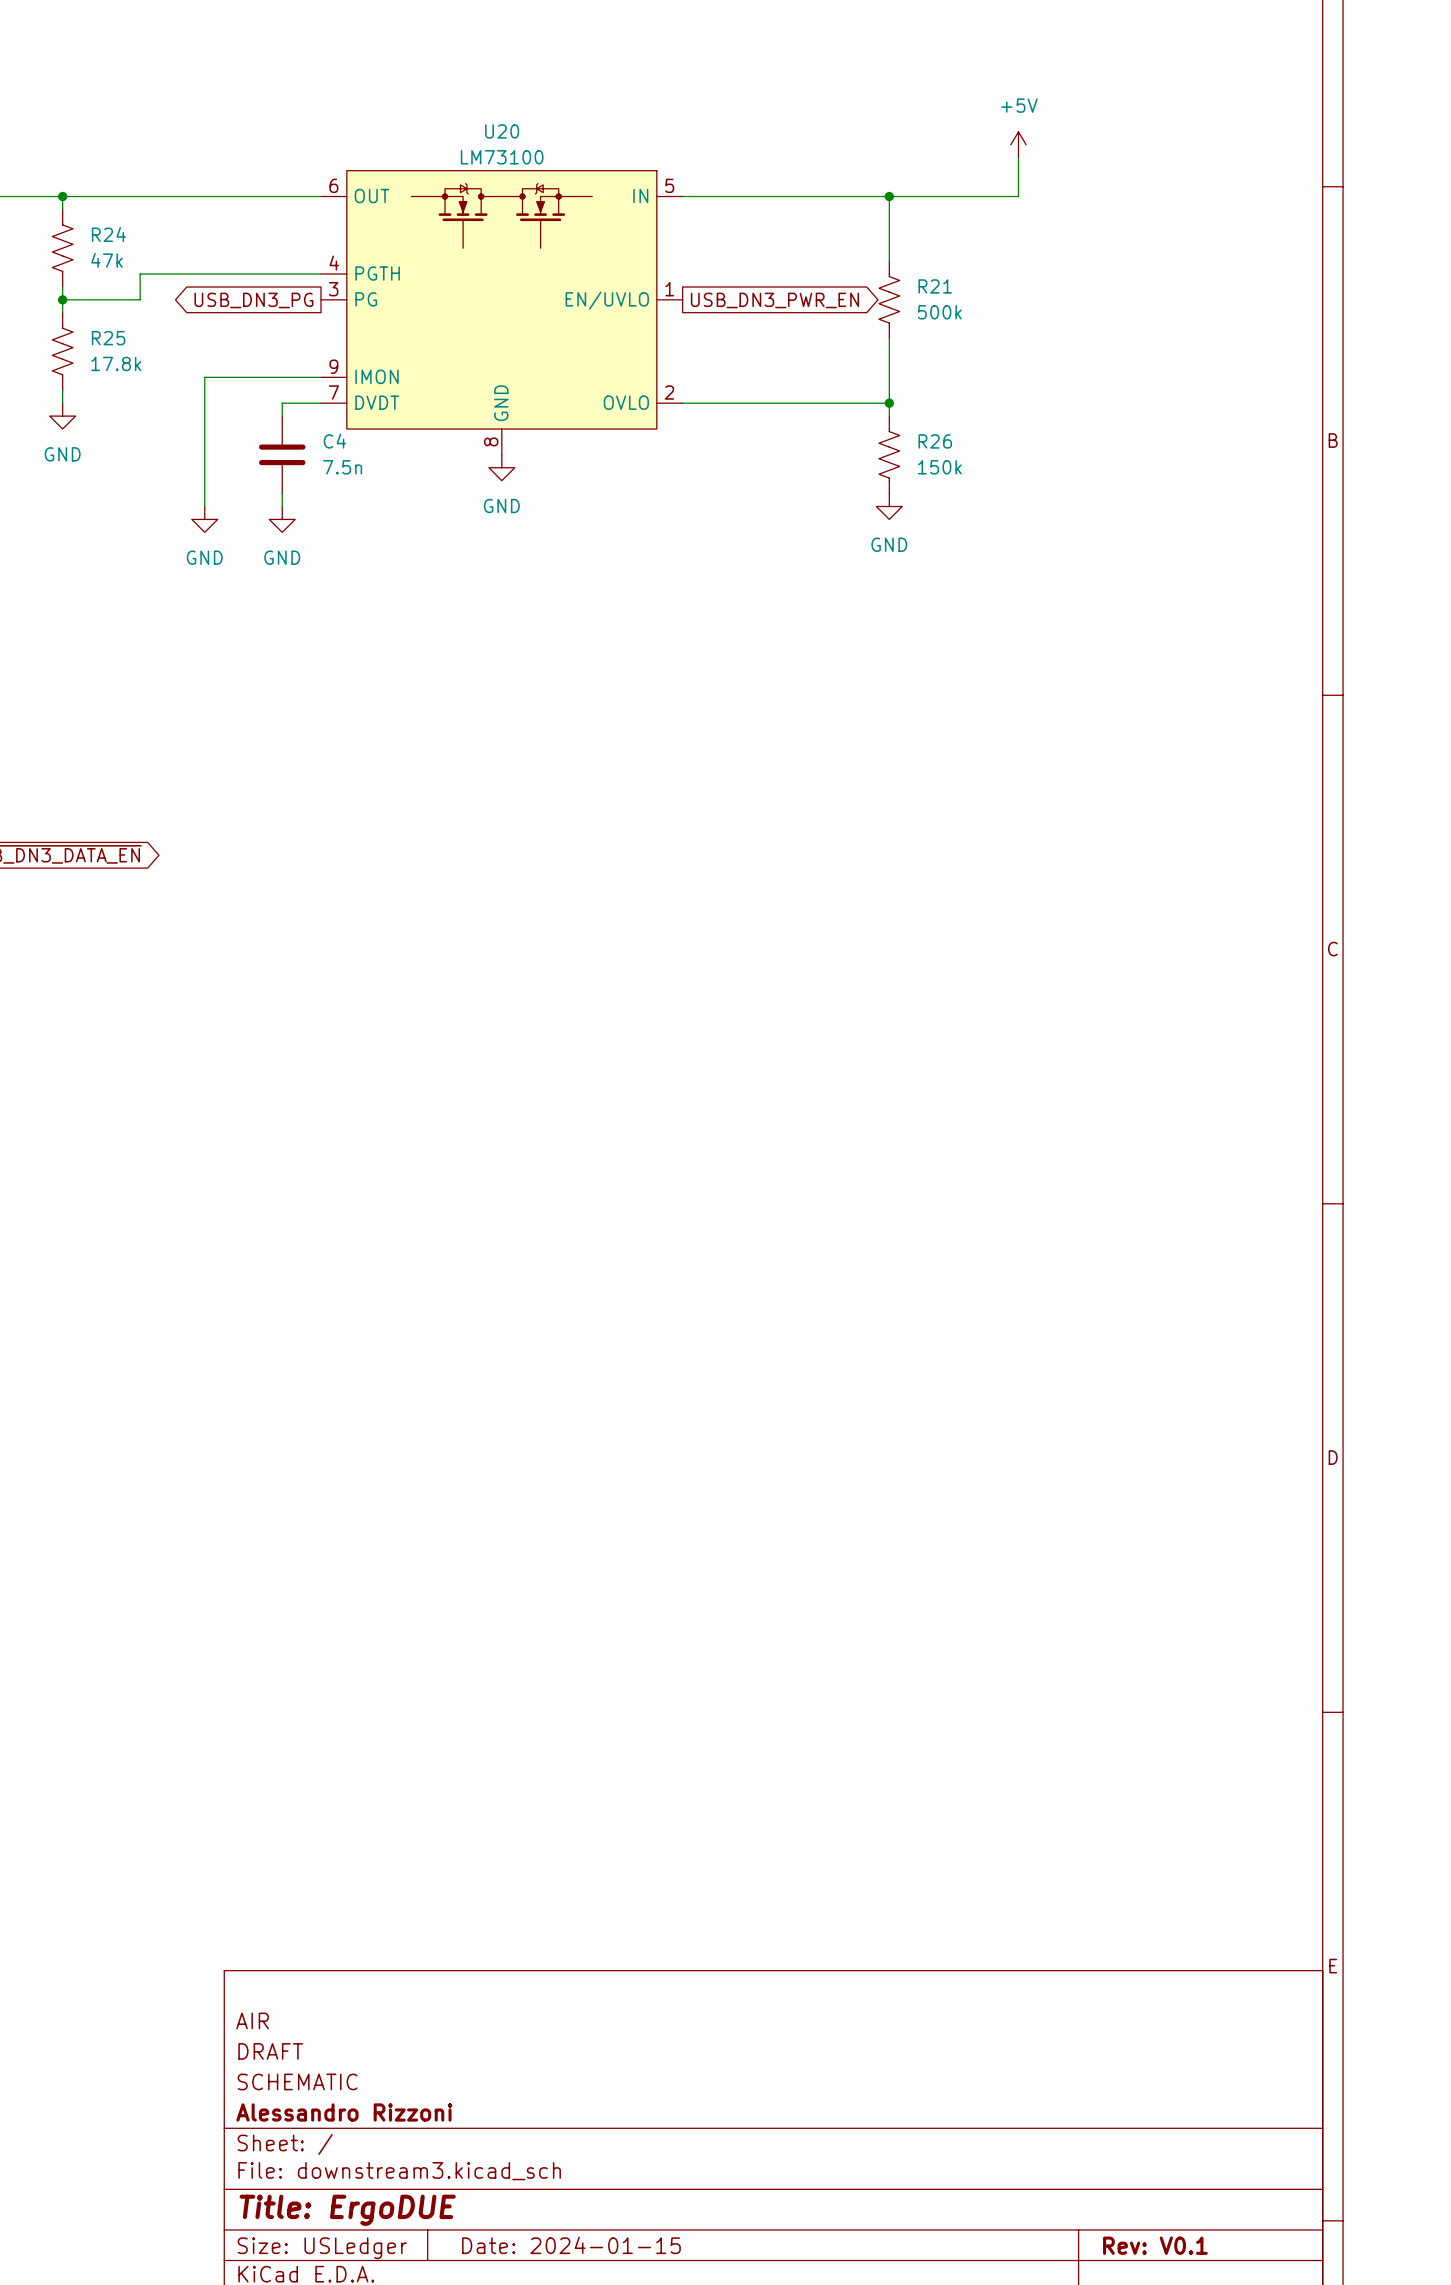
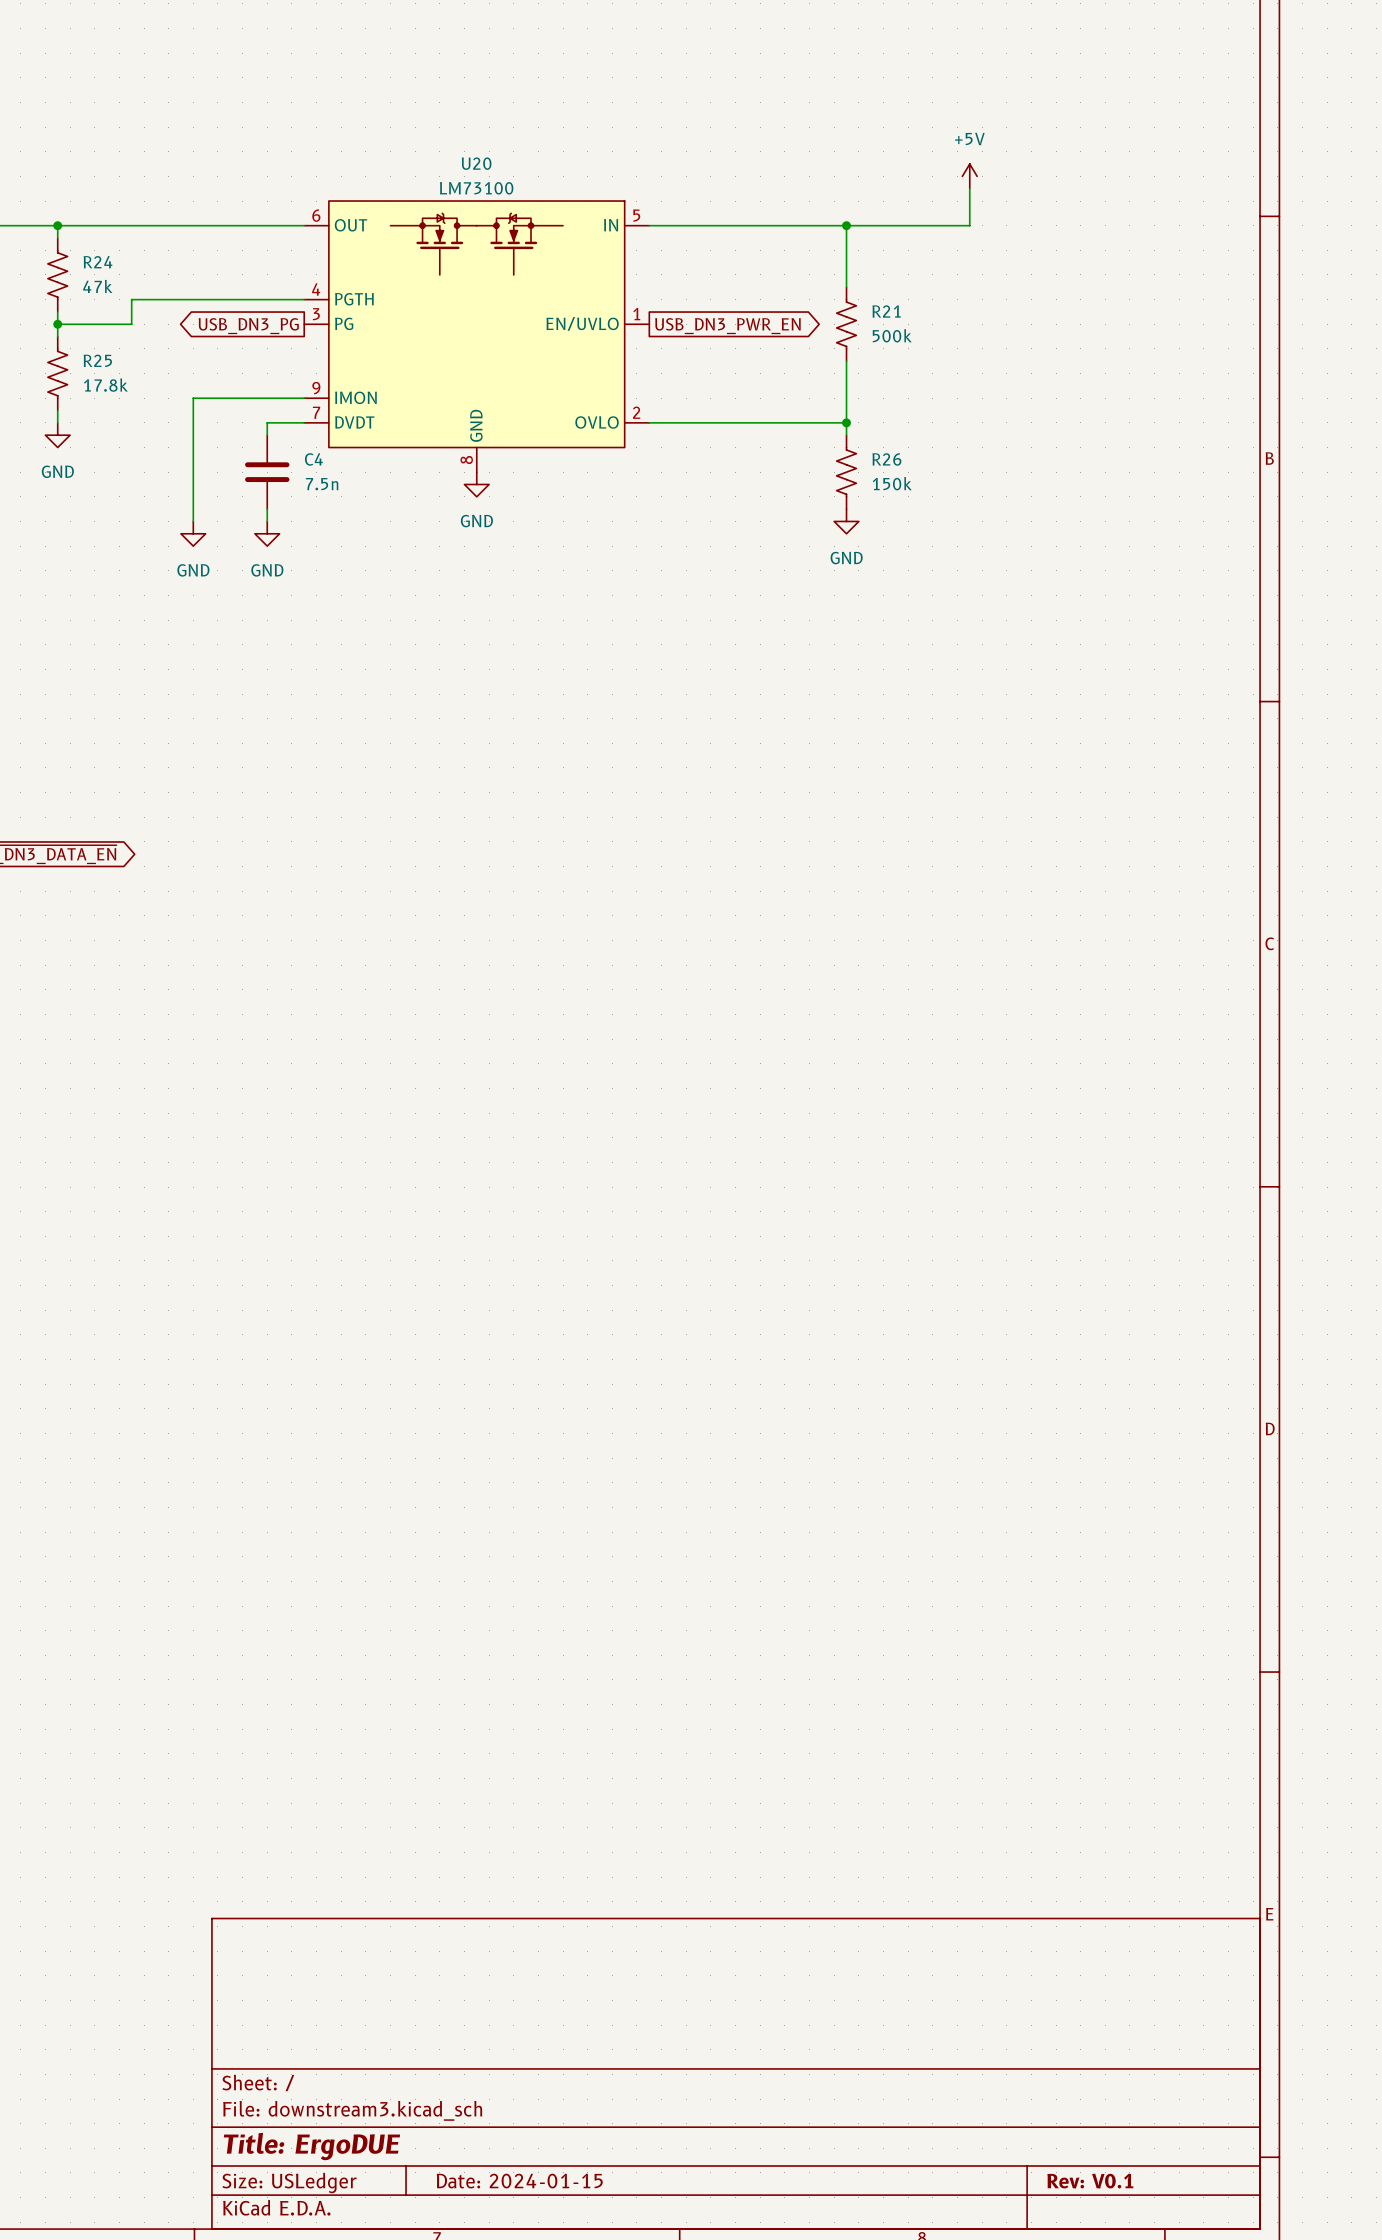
title block: AIR (252, 2020) -> none
title block: DRAFT (270, 2051) -> none
title block: SCHEMATIC (297, 2081) -> none
title block: Alessandro Rizzoni (344, 2112) -> none

